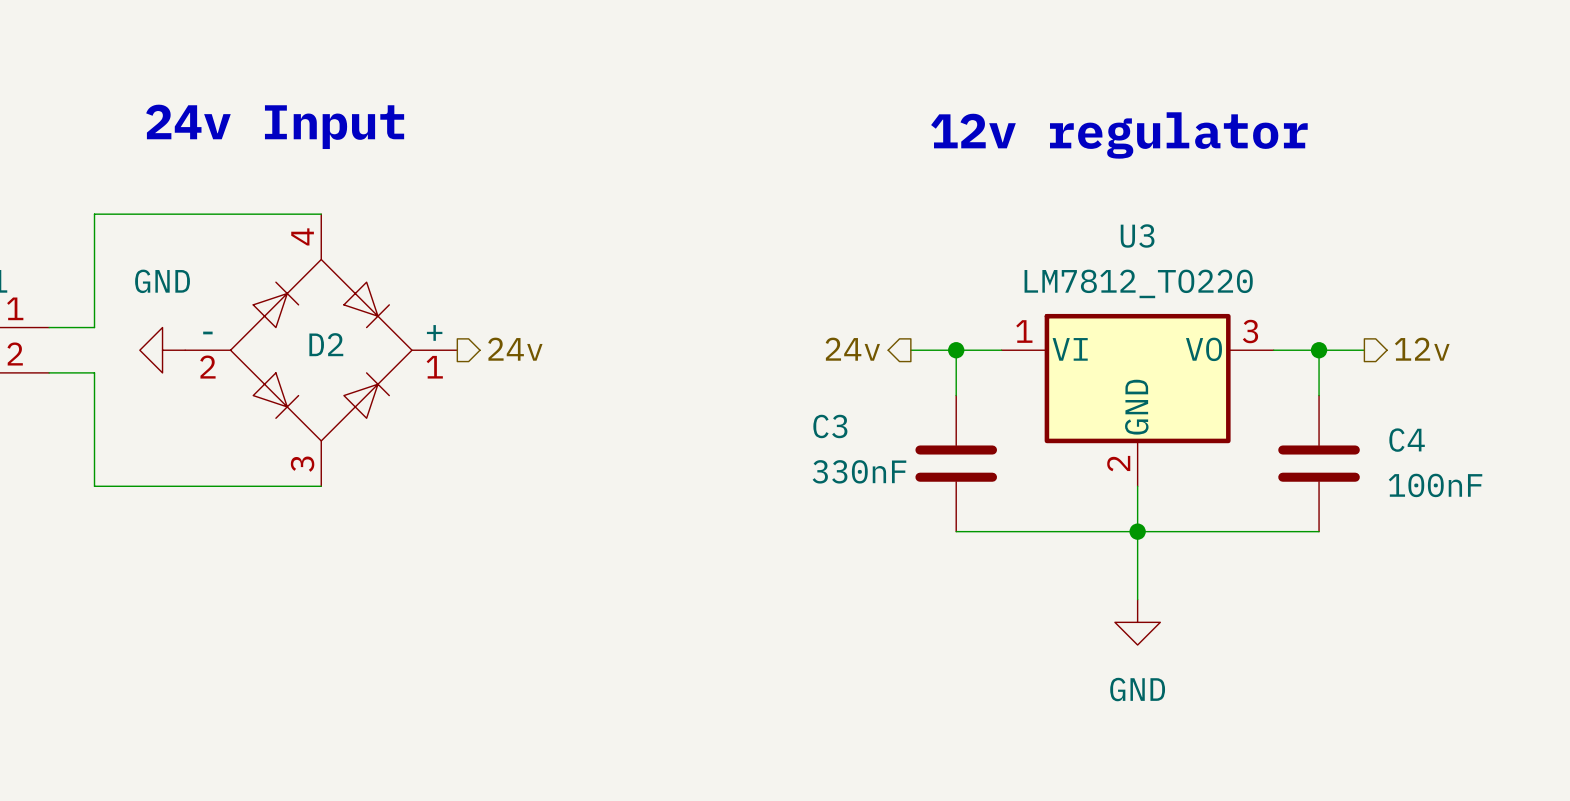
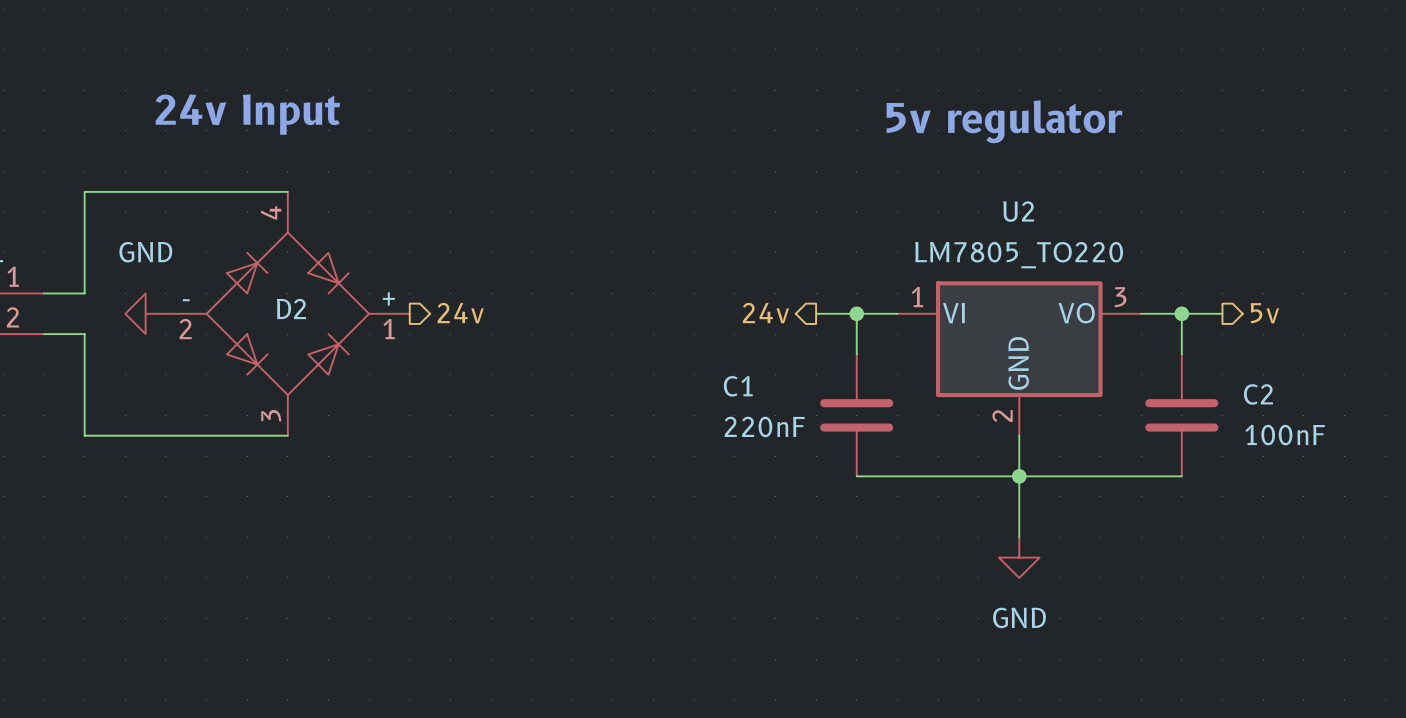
text: 12v regulator (1119, 135) -> 5v regulator (1004, 121)
U3 name: U3 (1137, 236) -> U2 (1018, 211)
U3 value: LM7812_TO220 (1138, 283) -> LM7805_TO220 (1019, 255)
hierarchical label: 12v (1422, 349) -> 5v (1265, 313)
C3 name: C3 (830, 426) -> C1 (738, 386)
C4 name: C4 (1407, 440) -> C2 (1258, 394)
C3 value: 330nF (859, 471) -> 220nF (764, 426)

